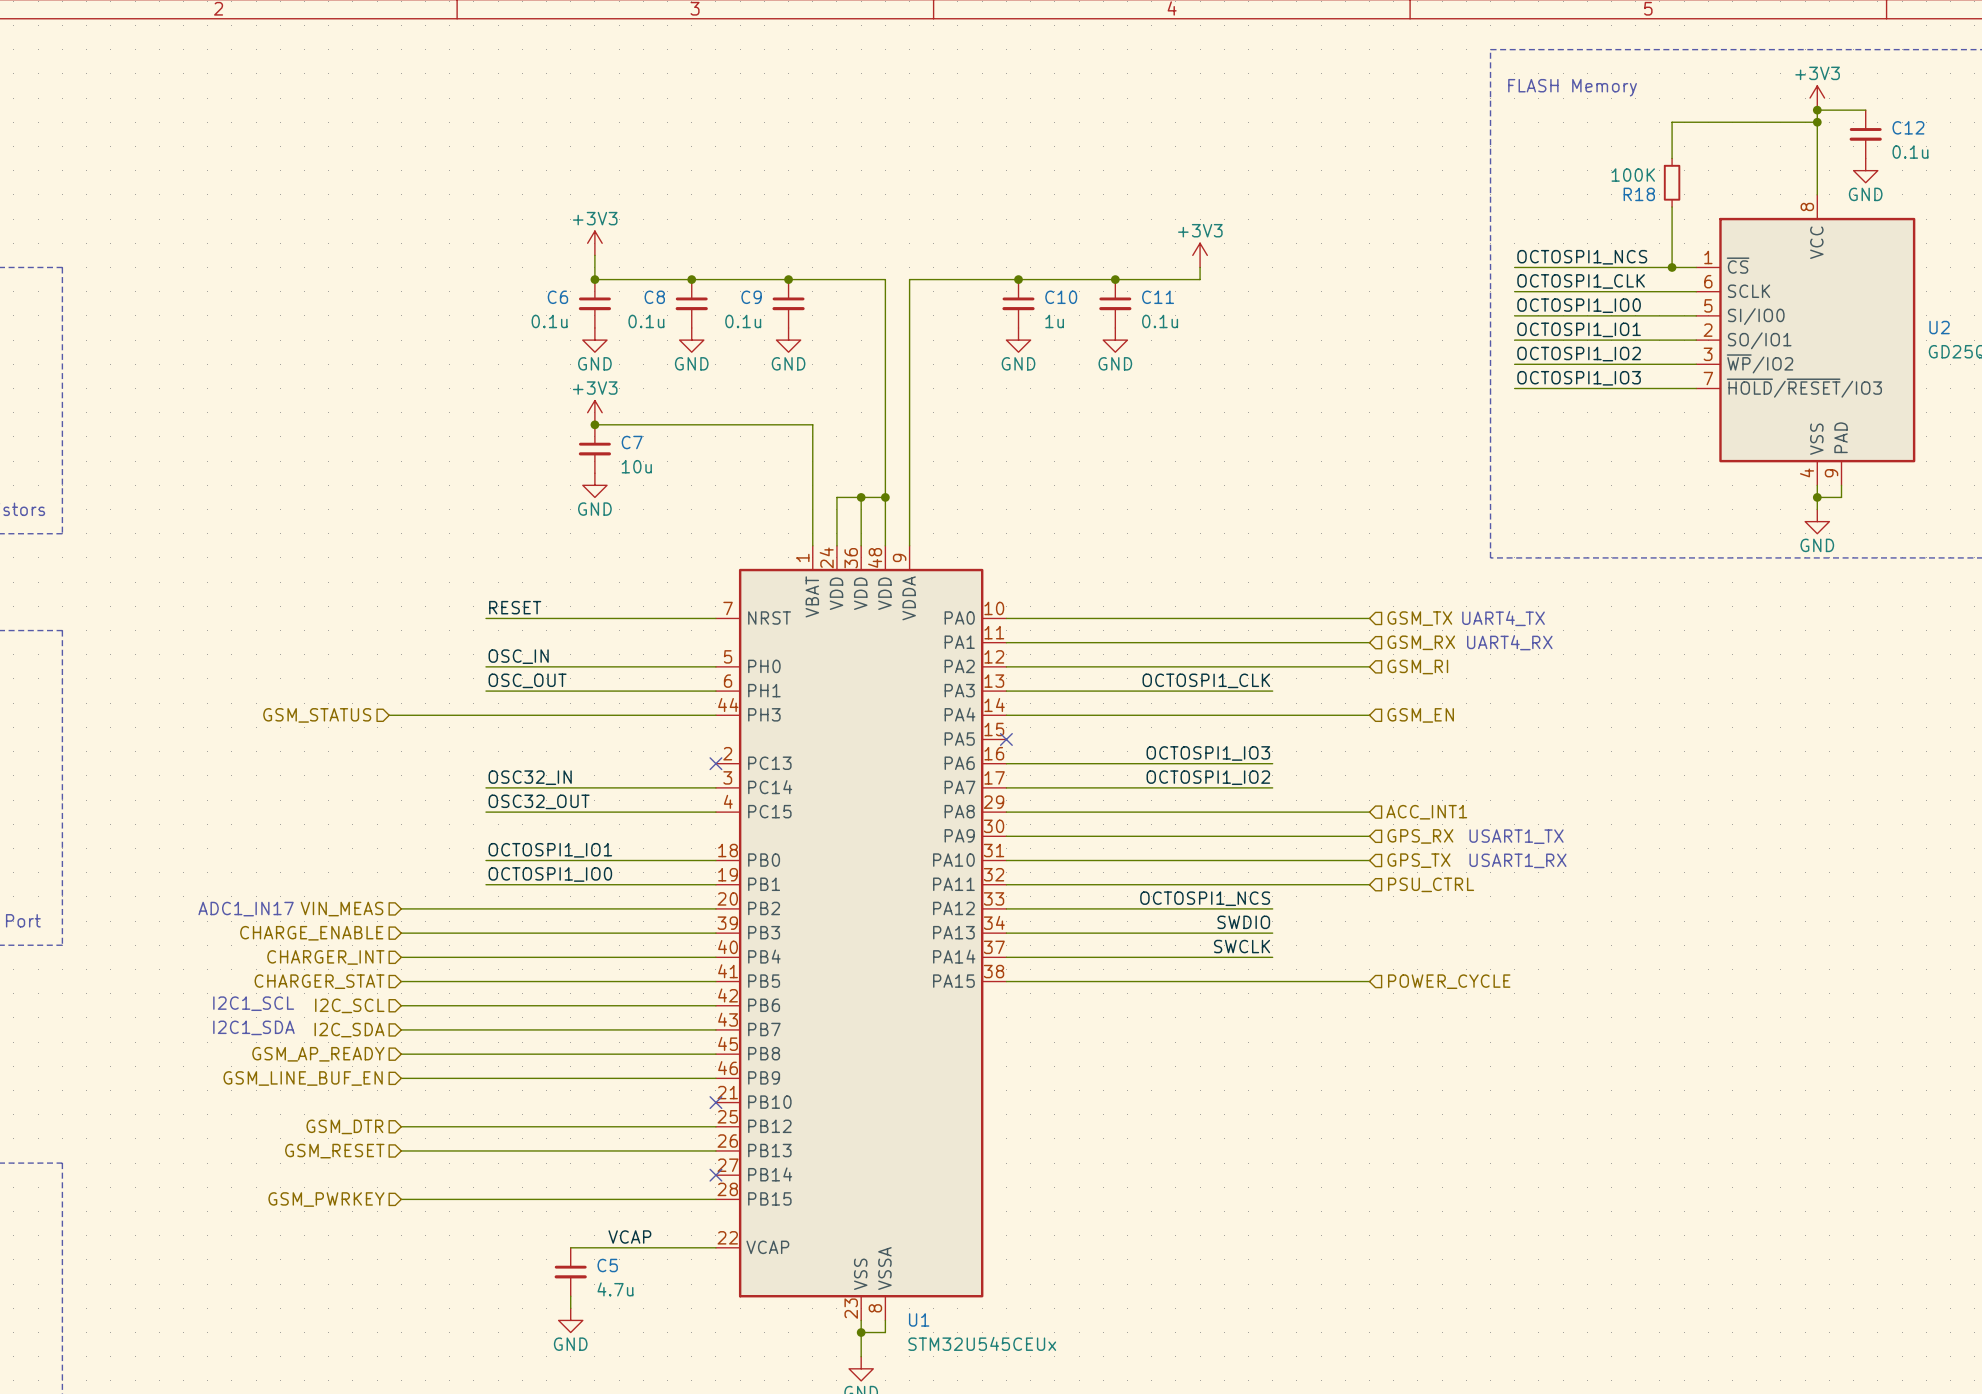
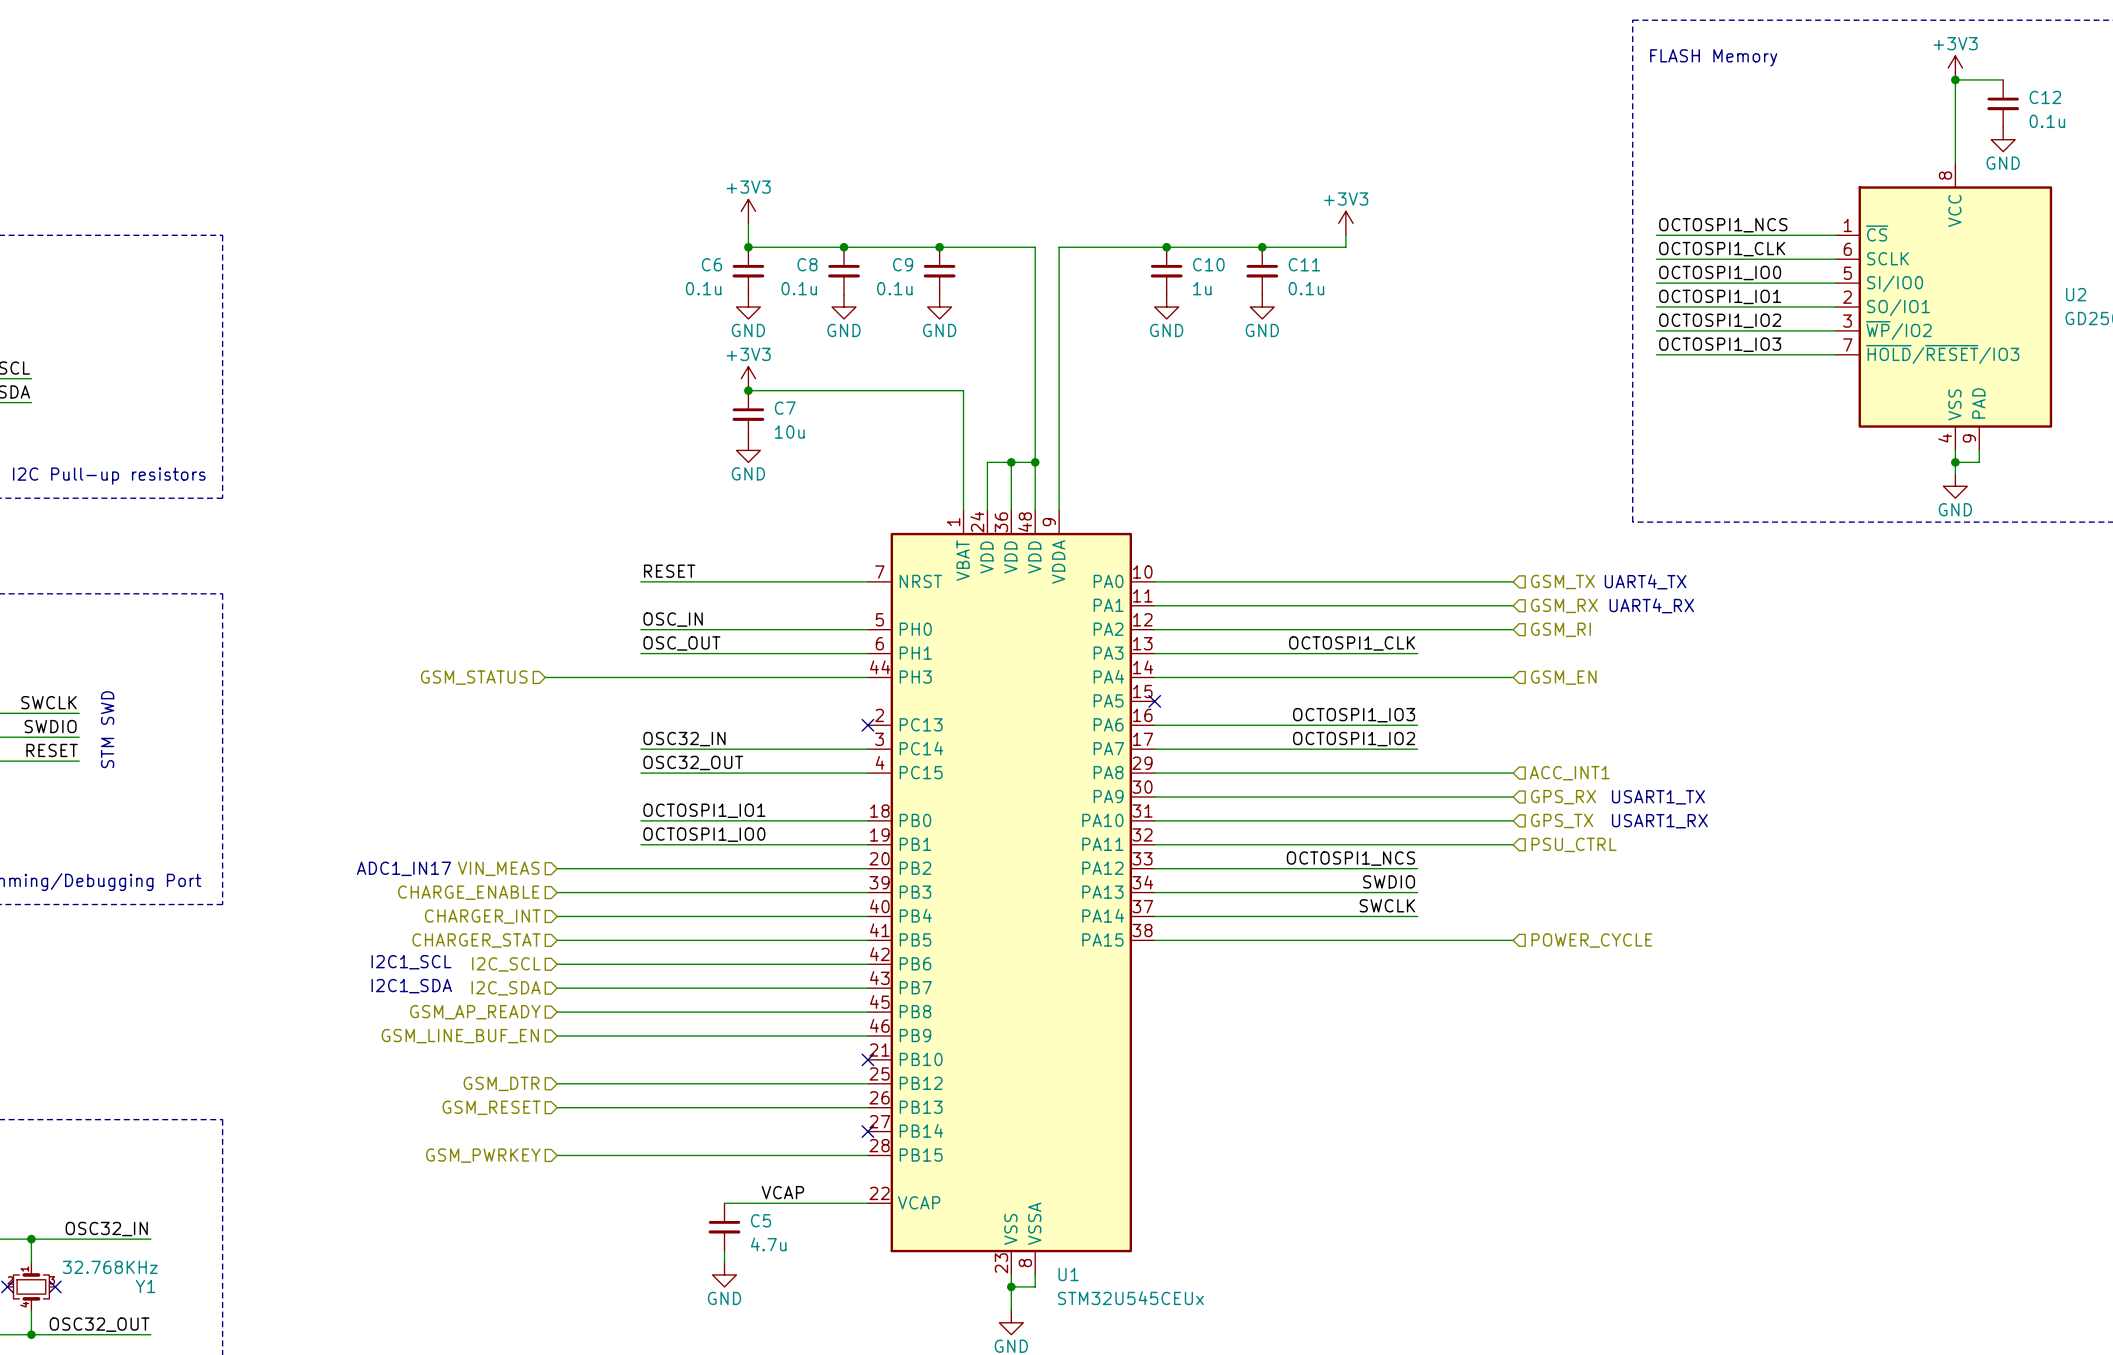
wire: (1817, 122) (1672, 122) (1672, 158) -> none
junction: (1817, 122) -> none
R18: 100K (1672, 182) -> none
wire: (1672, 206) (1672, 267) -> none
junction: (1672, 267) -> none

